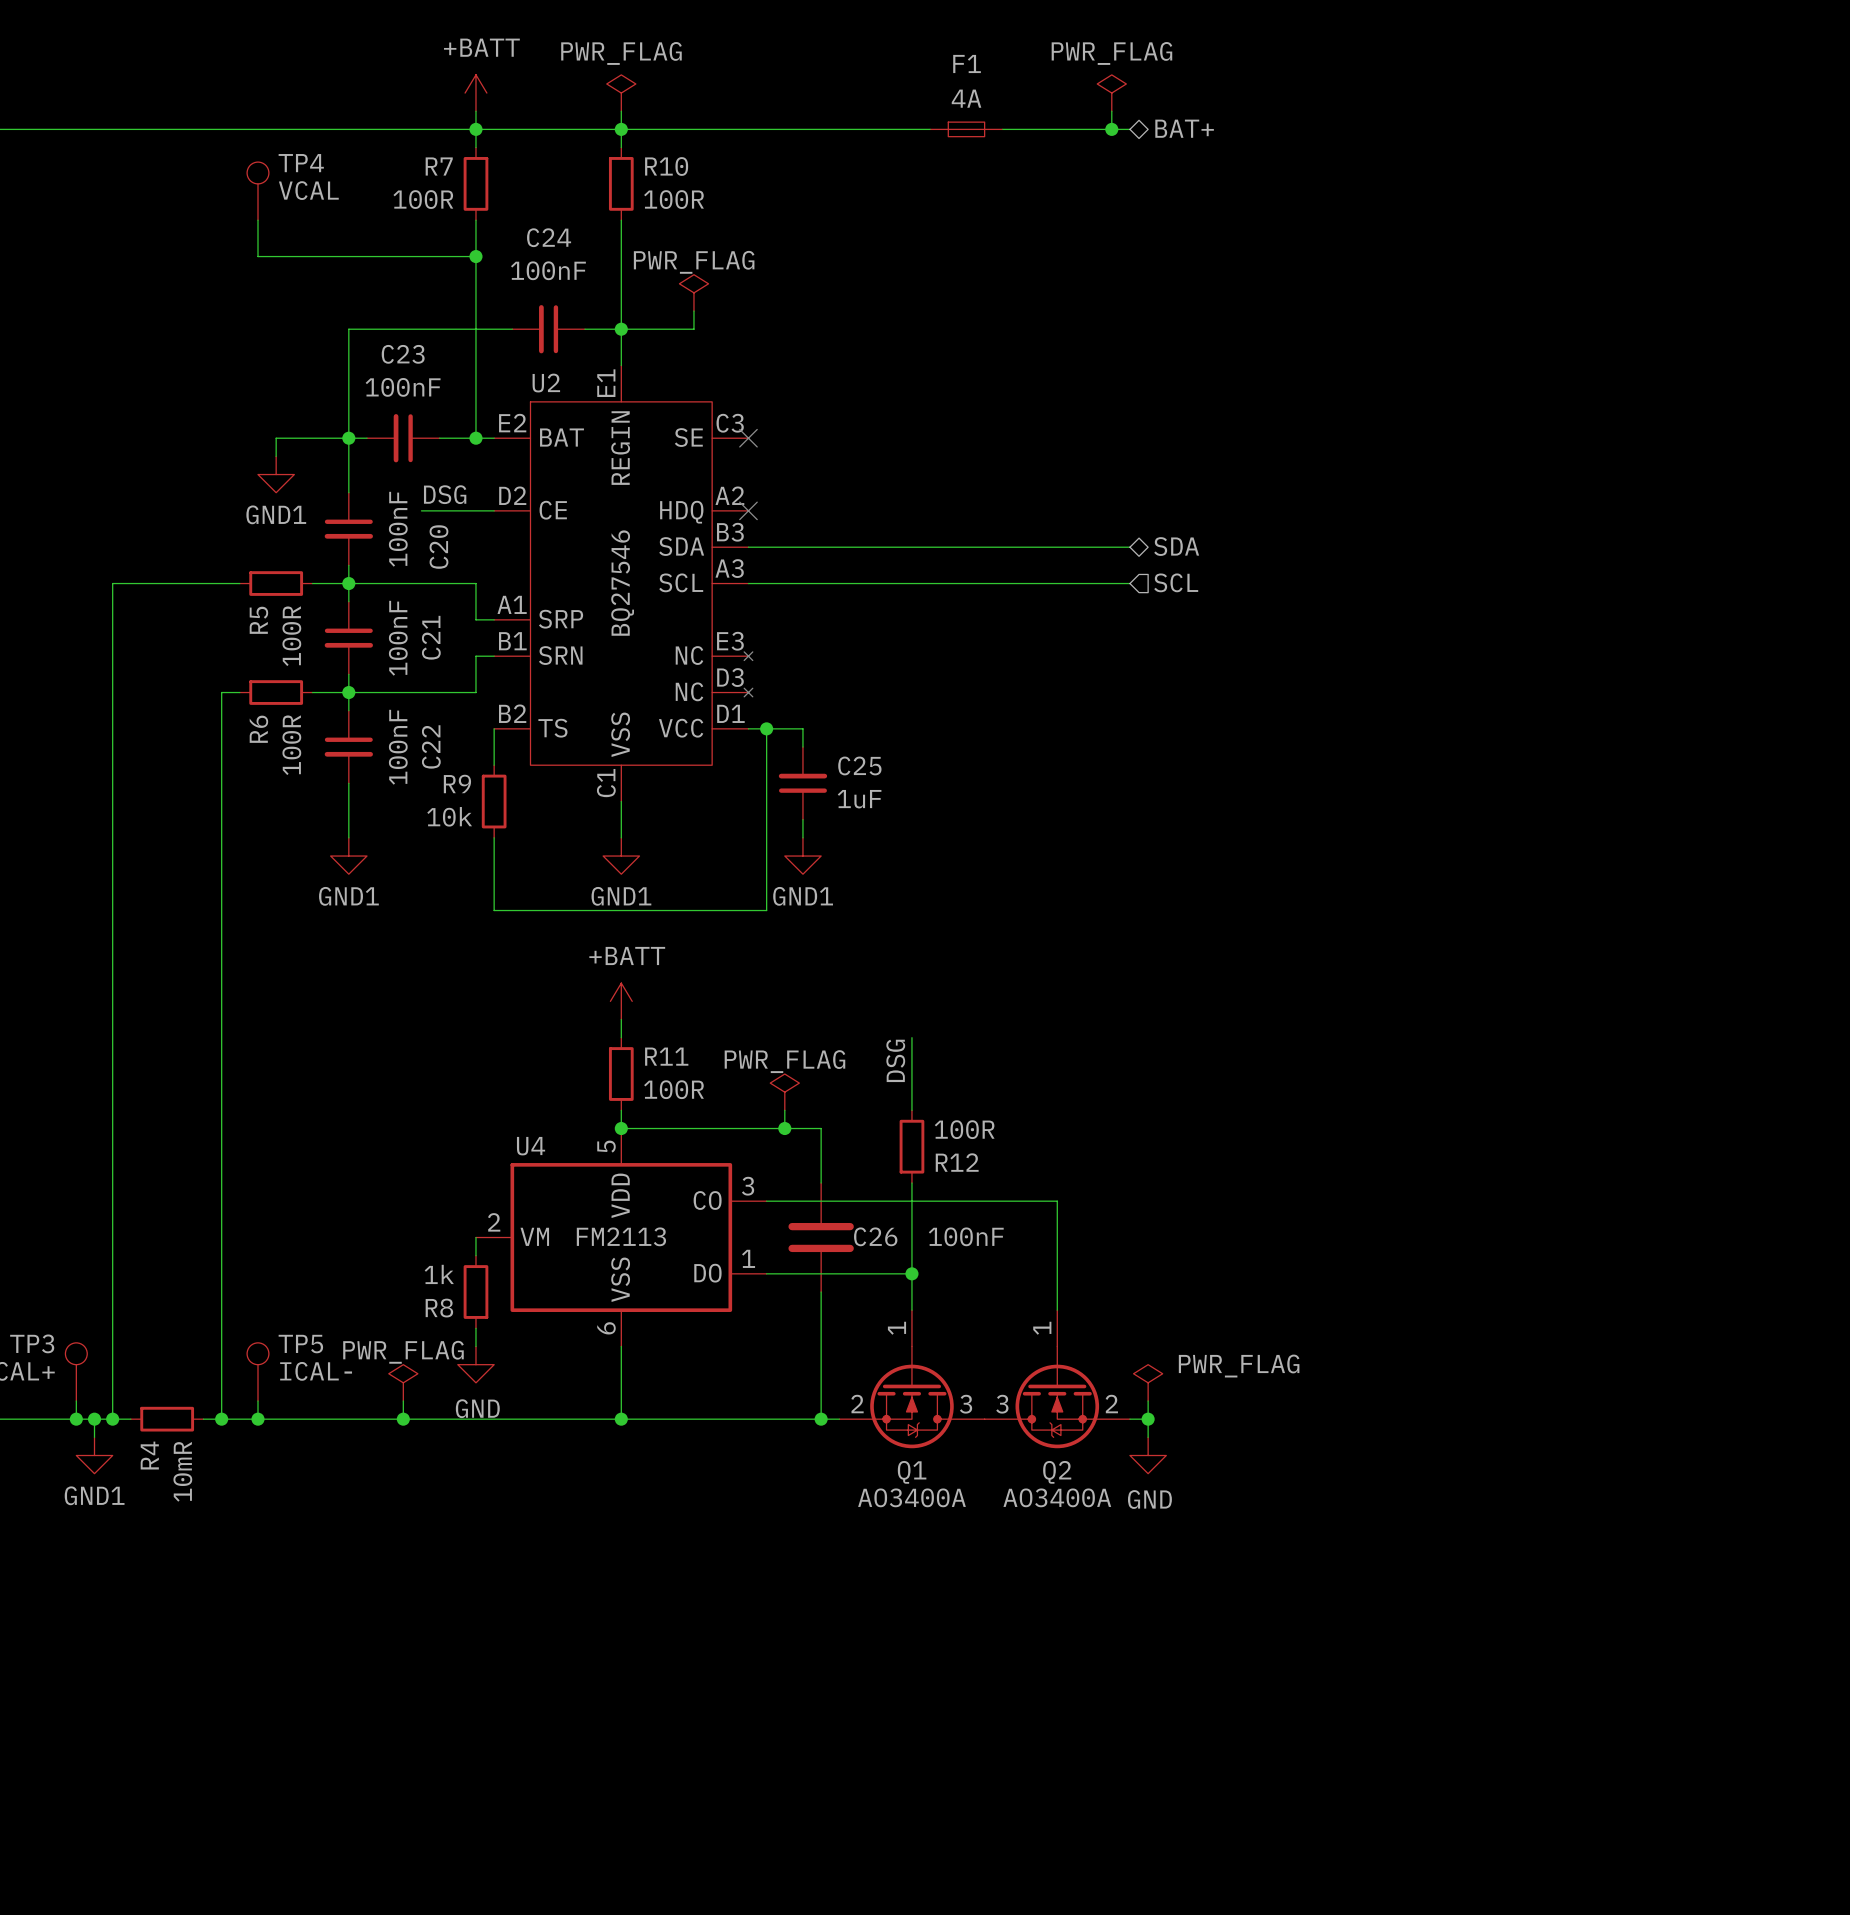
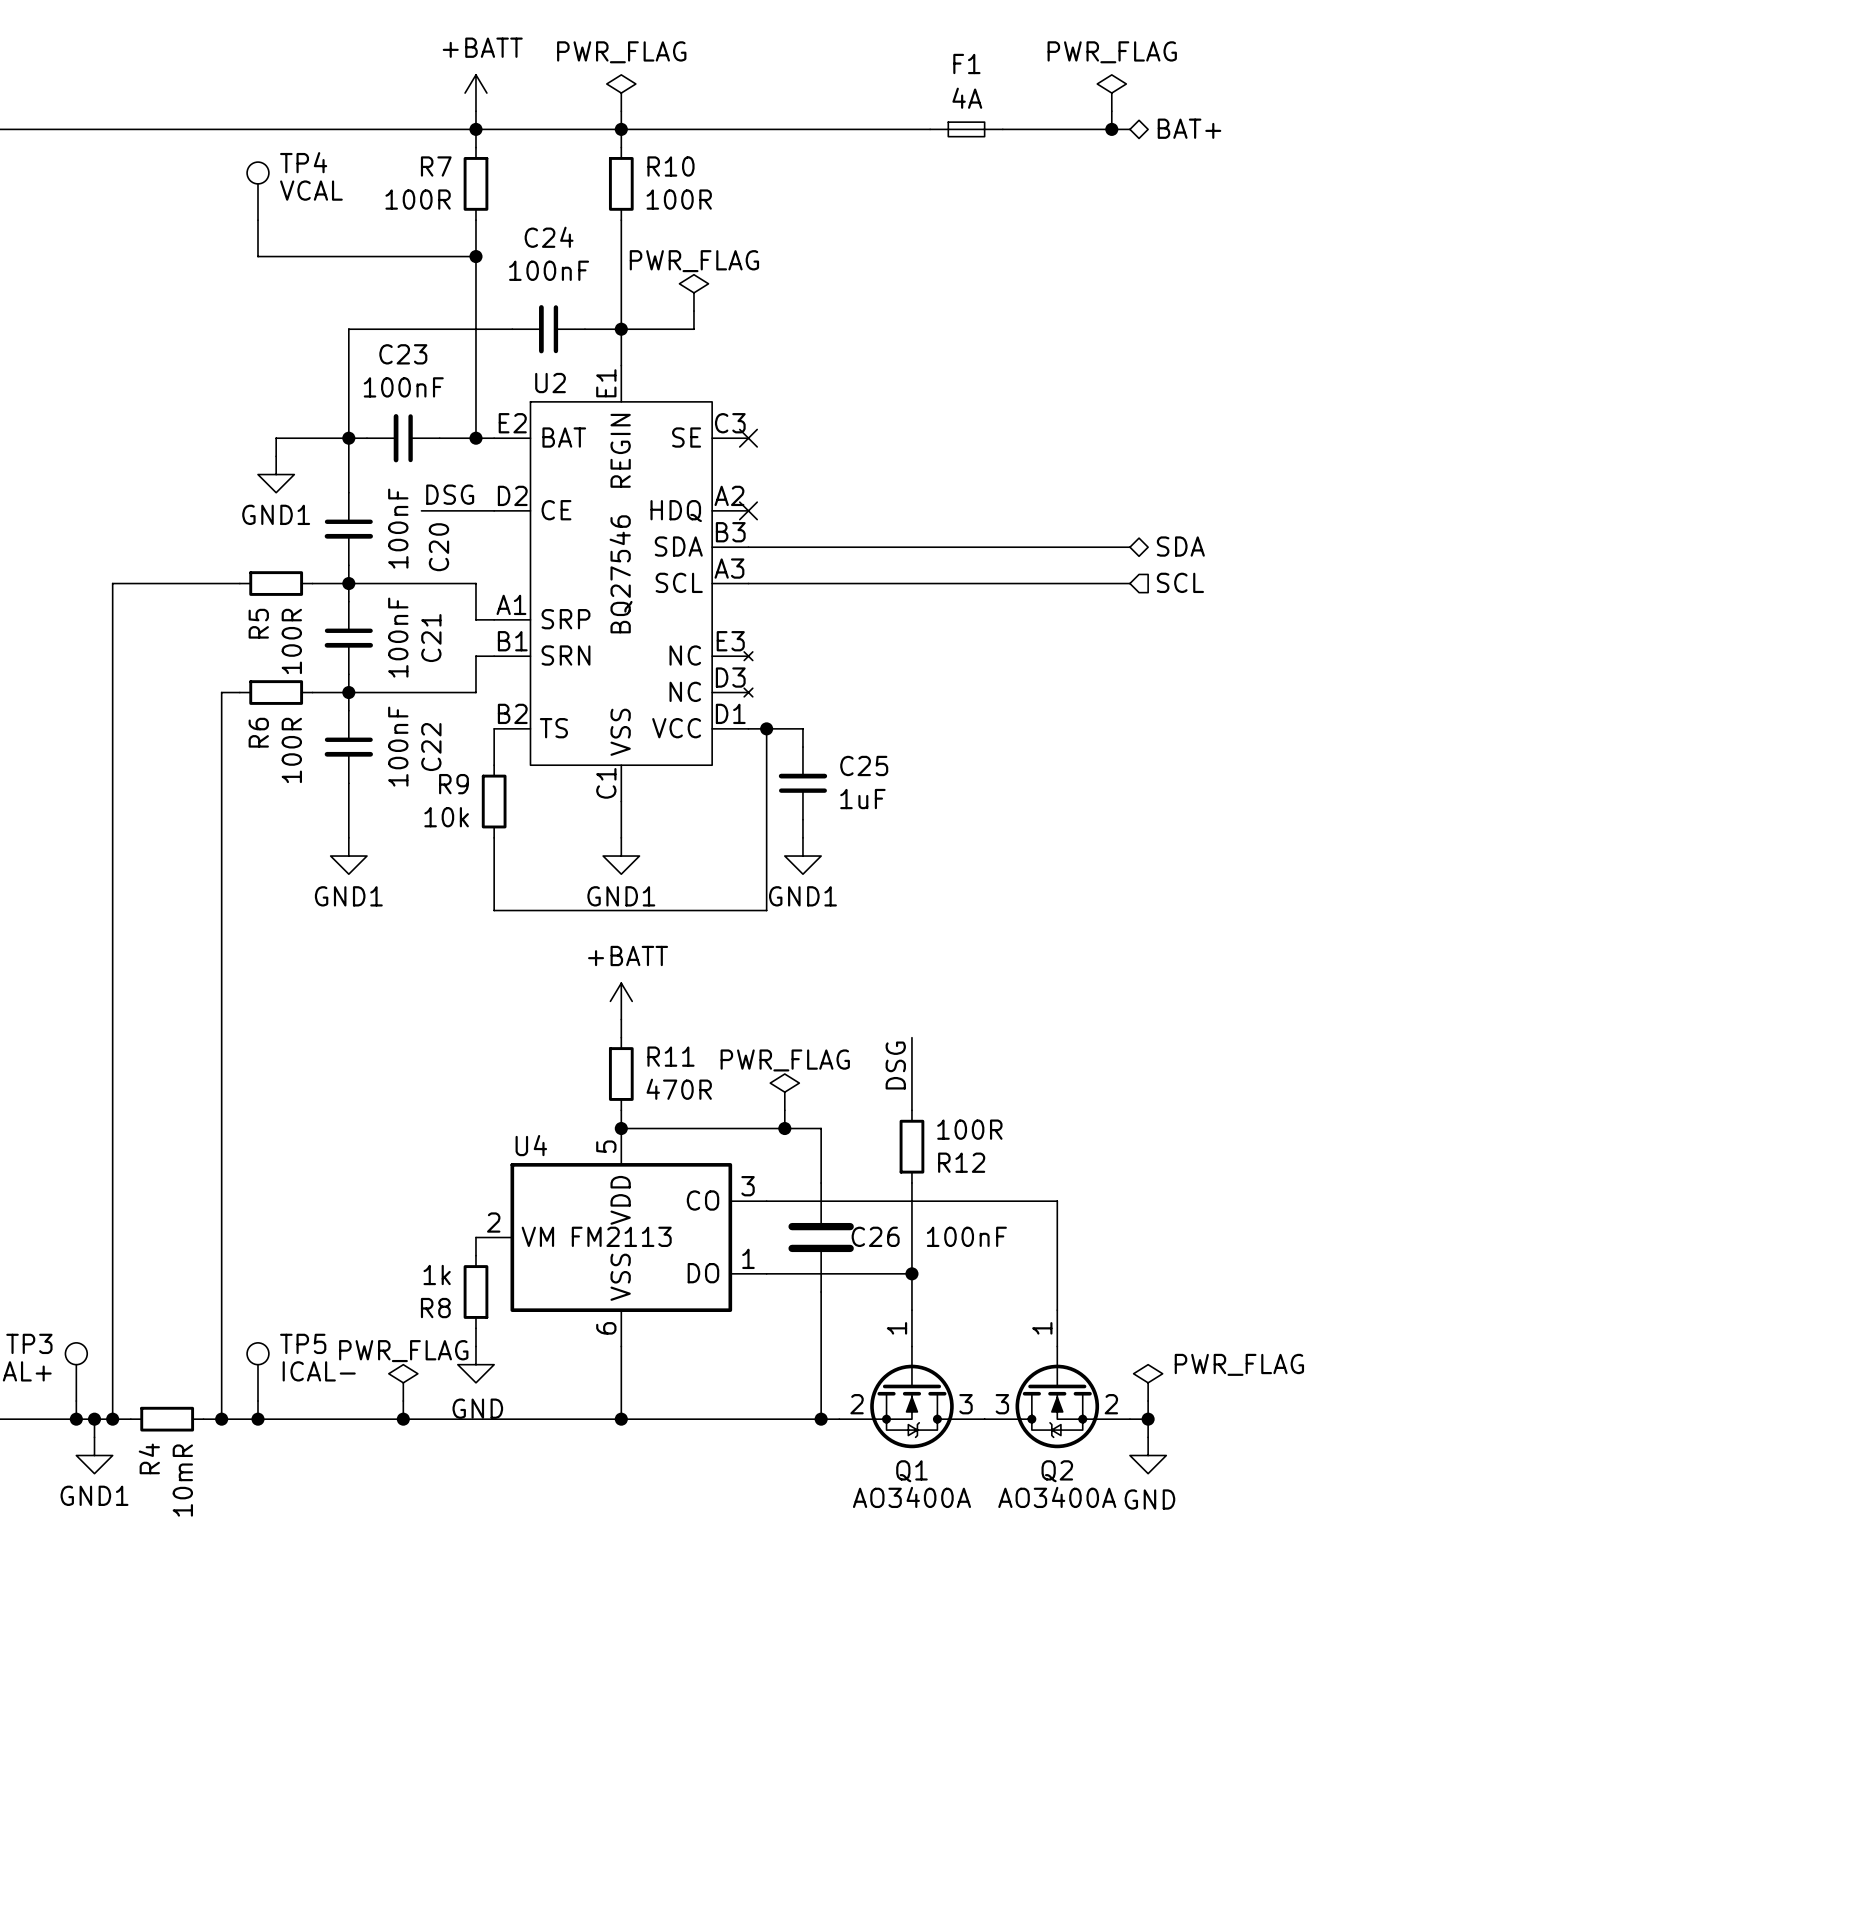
R11 value: 100R (674, 1089) -> 470R (679, 1089)

